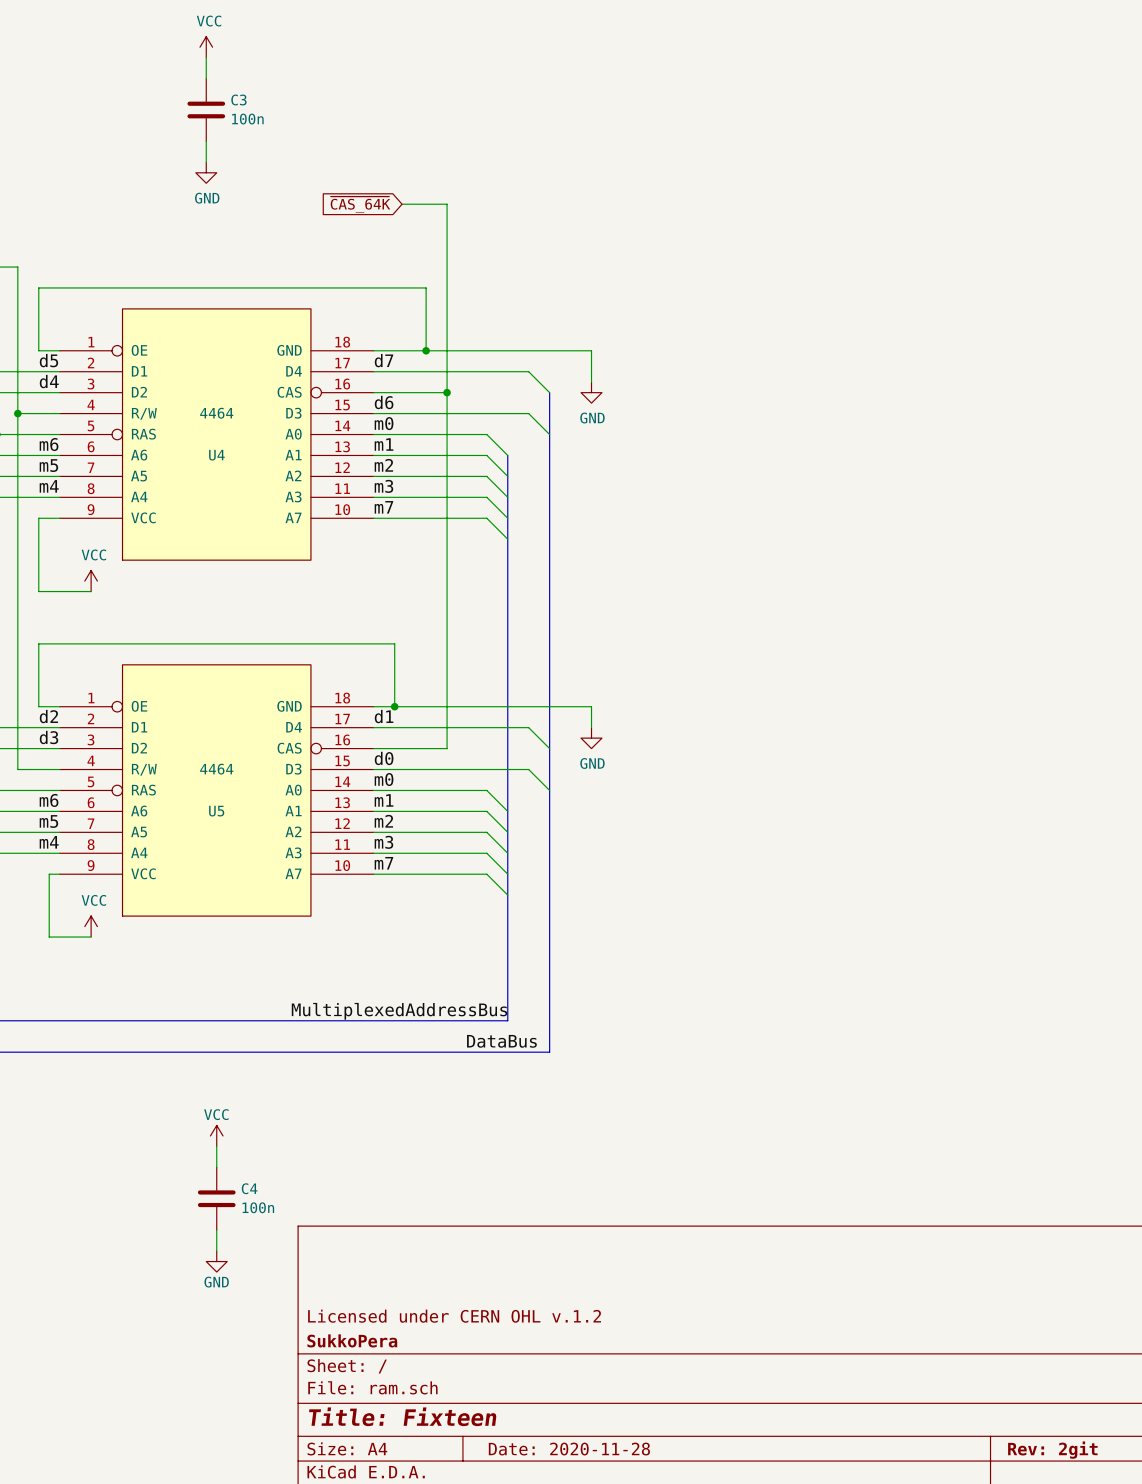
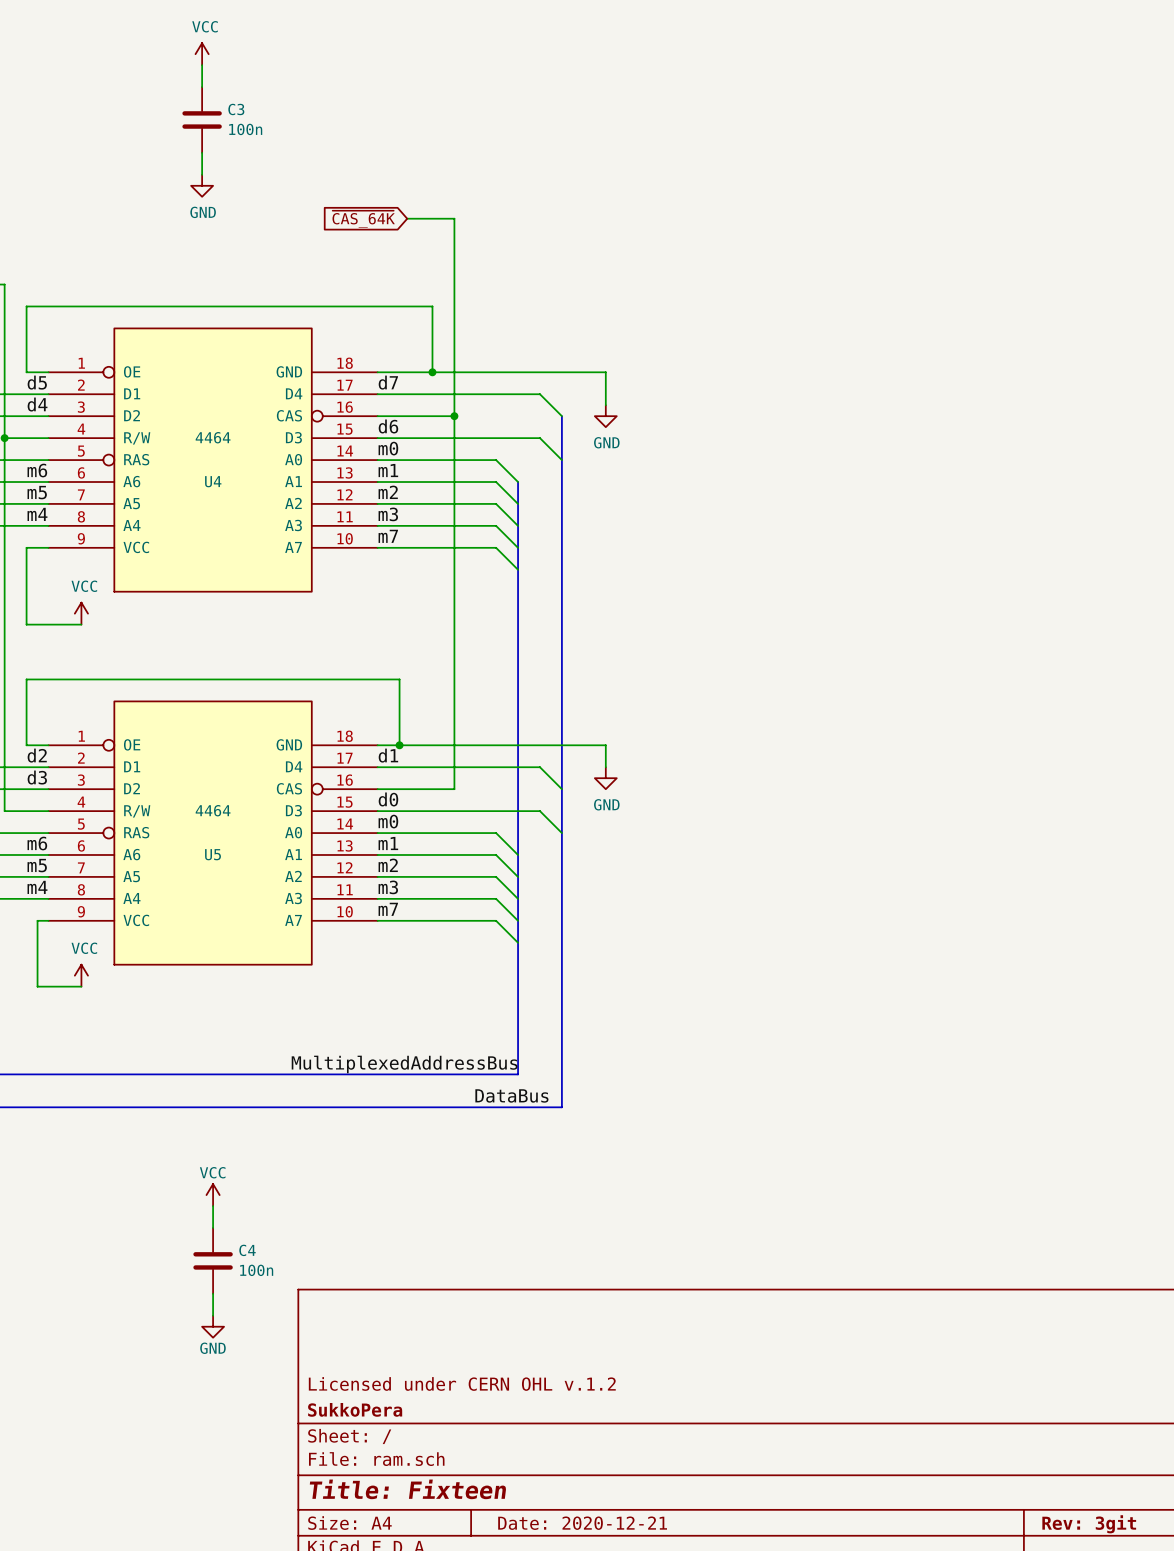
title block: Date: 2020-11-28 (569, 1449) -> Date: 2020-12-21 (582, 1523)
title block: Rev: 2git (1052, 1450) -> Rev: 3git (1089, 1524)

